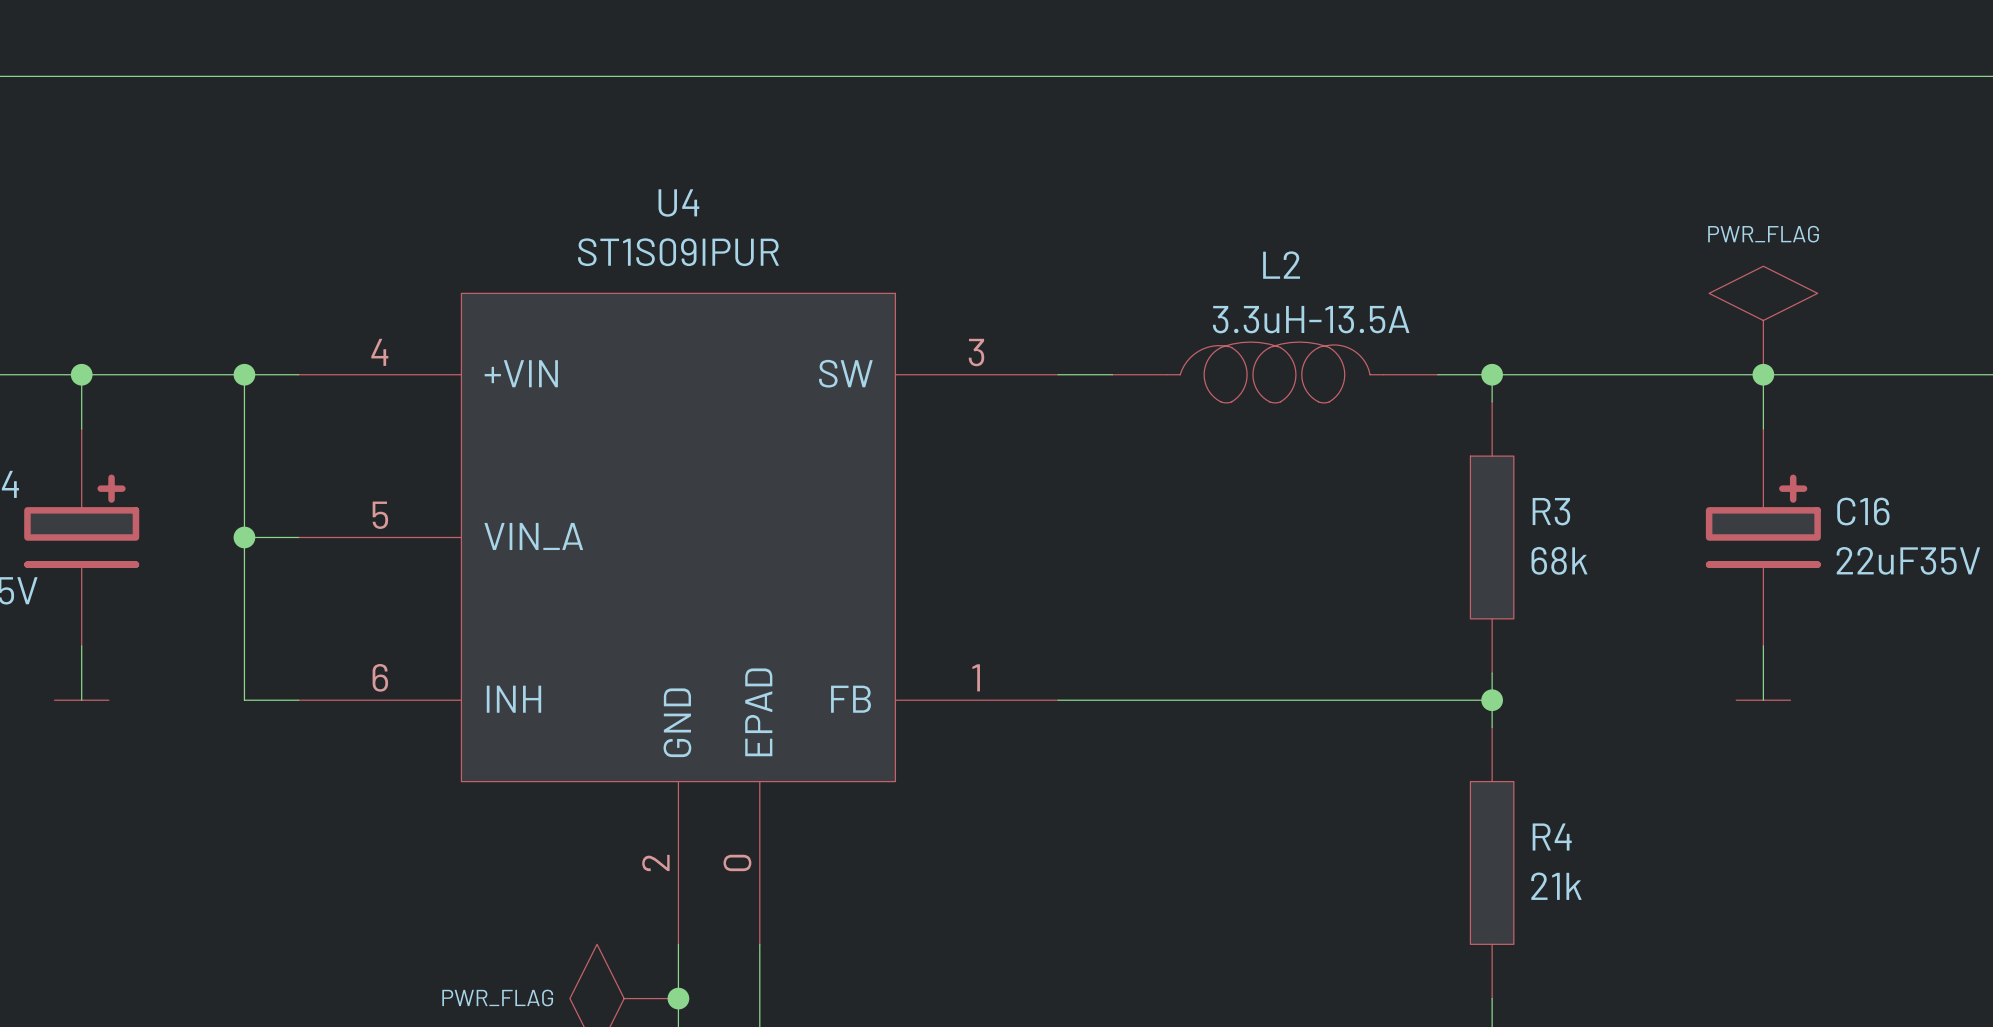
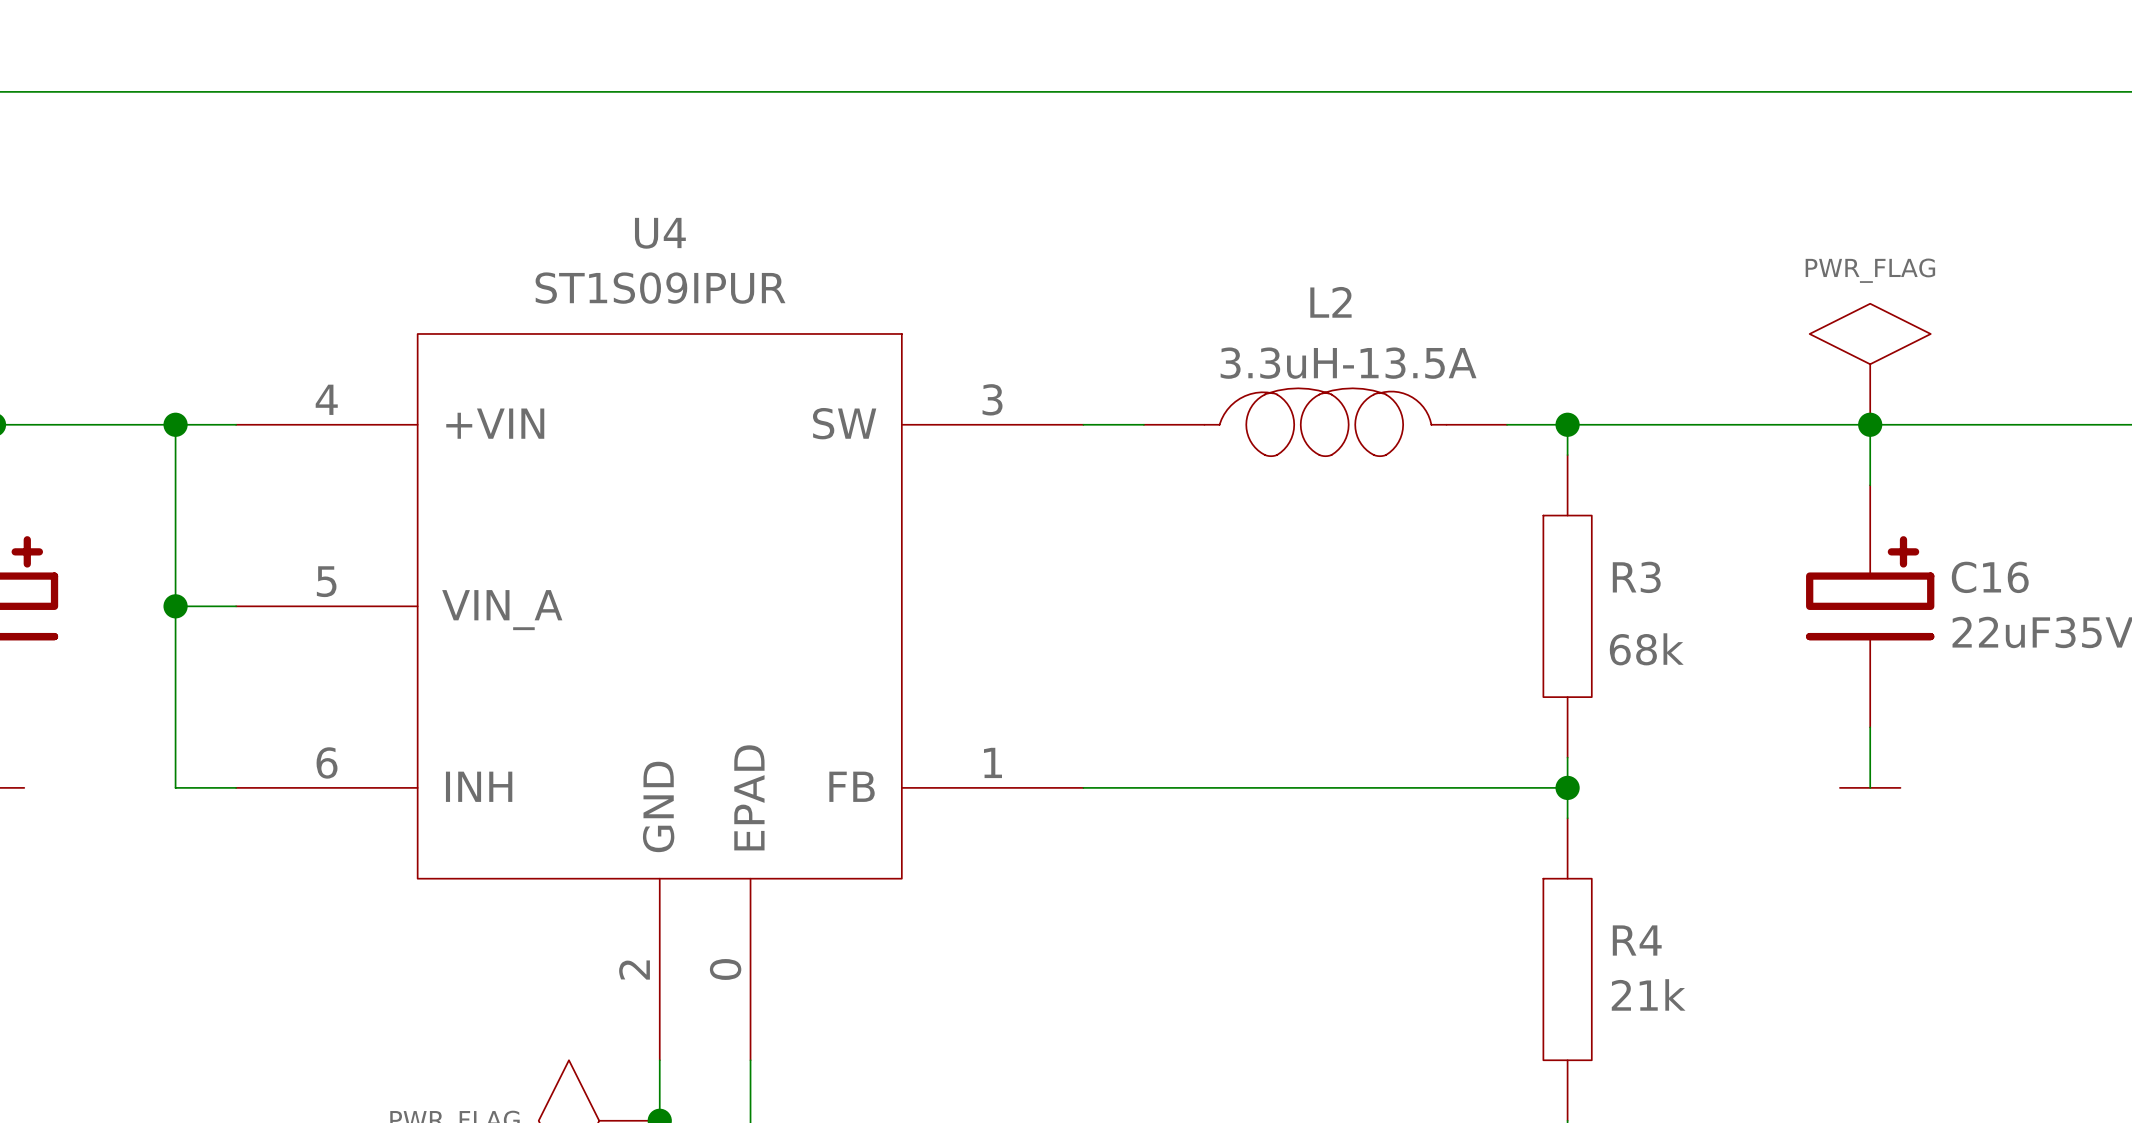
R3 value position: 68k (1559, 560) -> 68k (1646, 649)

